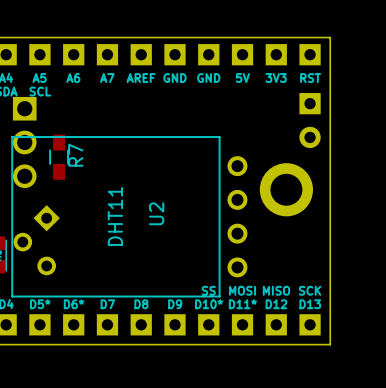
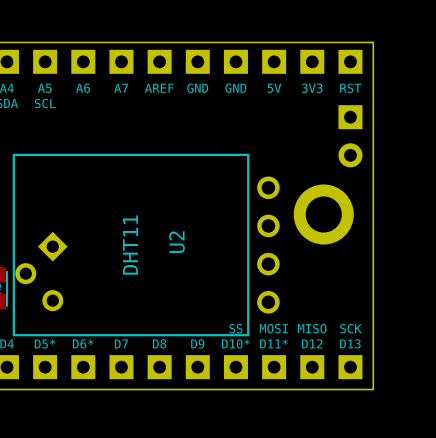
part: (24, 142) -> none
R7: (59, 157) -> none

